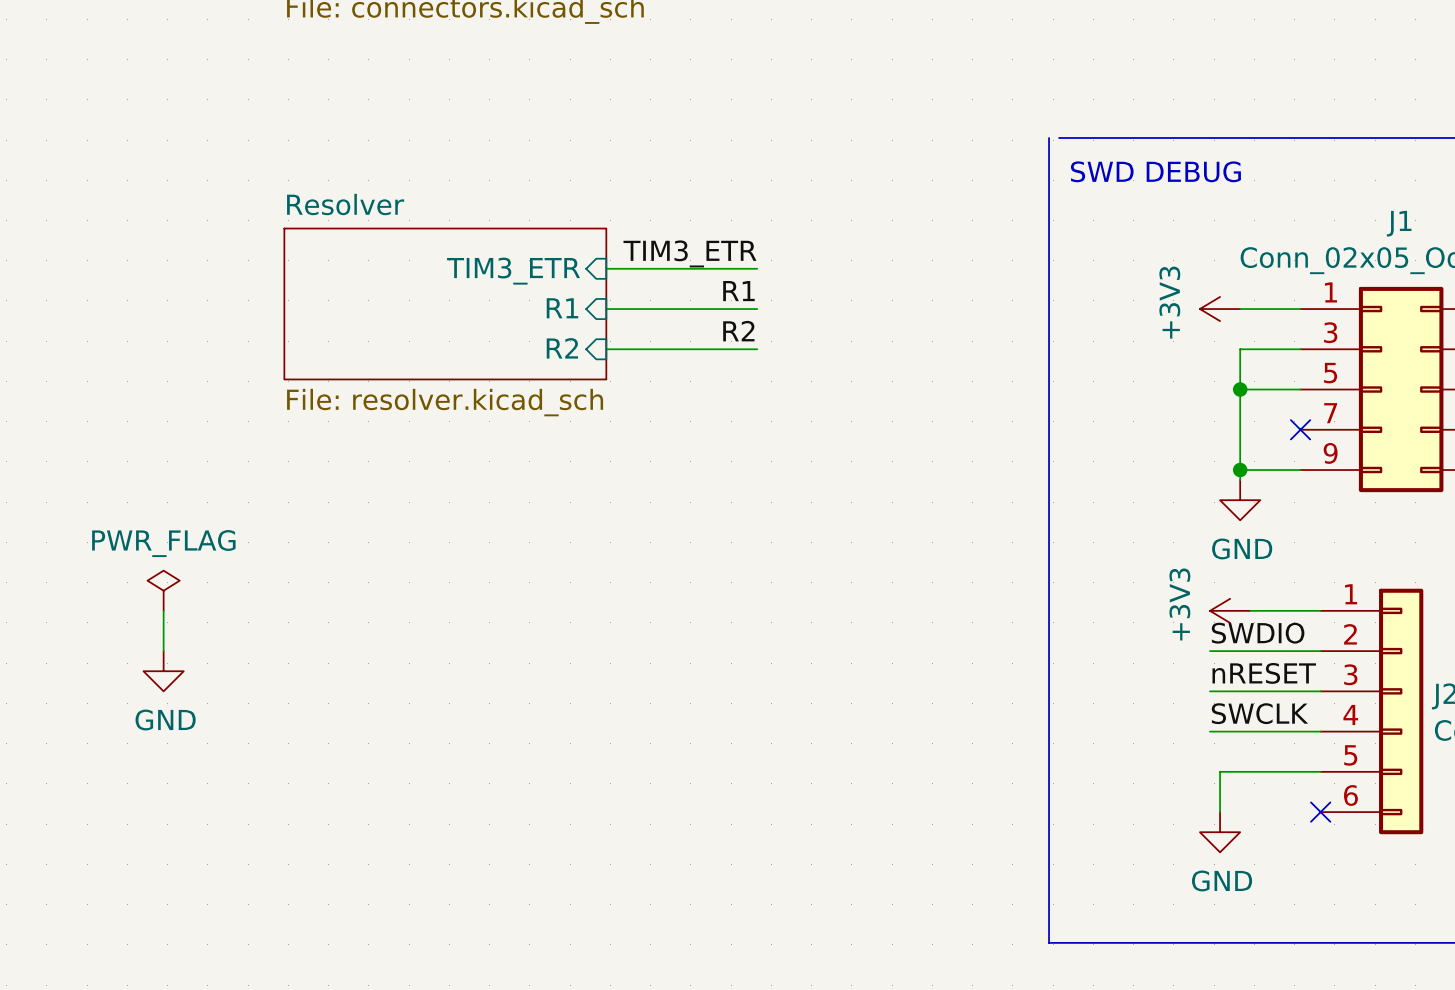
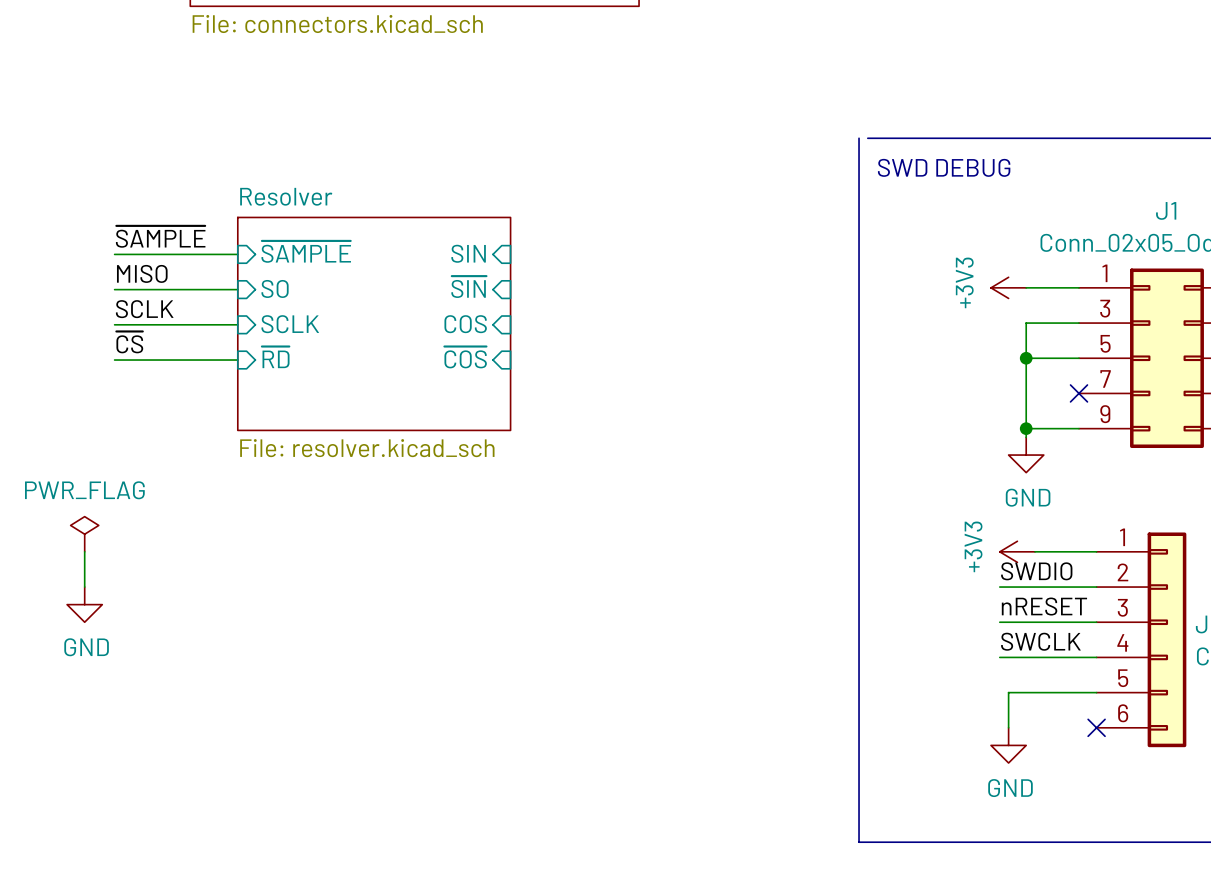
label: none -> ~{SAMPLE} (160, 236)
label: TIM3_ETR (689, 253) -> none
sheet pin: none -> ~{SAMPLE} (306, 251)
wire: (606, 268) (757, 268) -> none
wire: none -> (114, 254) (237, 254)
sheet pin: none -> SIN (468, 253)
sheet pin: TIM3_ETR (513, 271) -> none
label: R1 (738, 291) -> none
label: none -> MISO (142, 273)
sheet Resolver: File: resolver.kicad_sch (445, 304) -> none
sheet pin: R1 (562, 308) -> none
sheet pin: none -> ~{SIN} (468, 287)
wire: (606, 309) (757, 309) -> none
sheet pin: none -> SO (275, 288)
wire: none -> (114, 289) (237, 289)
label: R2 (738, 331) -> none
label: none -> SCLK (144, 309)
sheet pin: R2 (562, 348) -> none
wire: (606, 349) (757, 349) -> none
sheet pin: none -> SCLK (290, 324)
sheet Resolver: none -> File: resolver.kicad_sch (374, 323)
sheet pin: none -> COS (465, 324)
wire: none -> (114, 324) (237, 324)
label: none -> ~{CS} (129, 342)
sheet pin: none -> ~{RD} (275, 357)
sheet pin: none -> ~{COS} (465, 357)
wire: none -> (114, 360) (237, 360)

